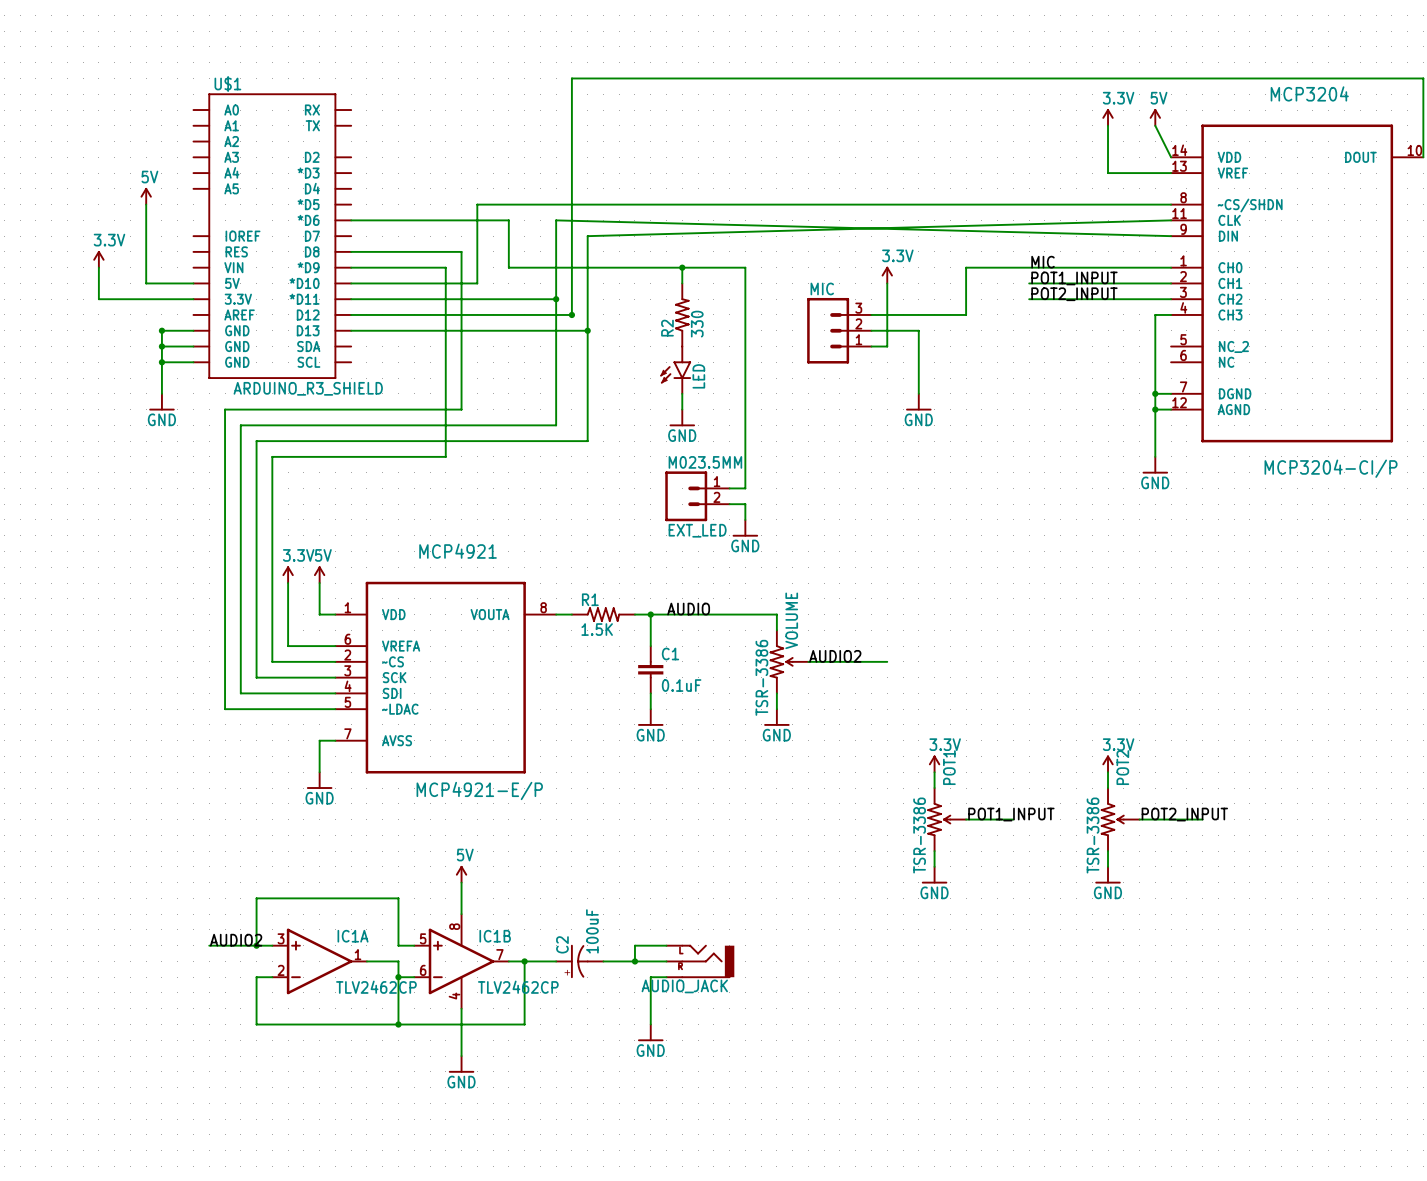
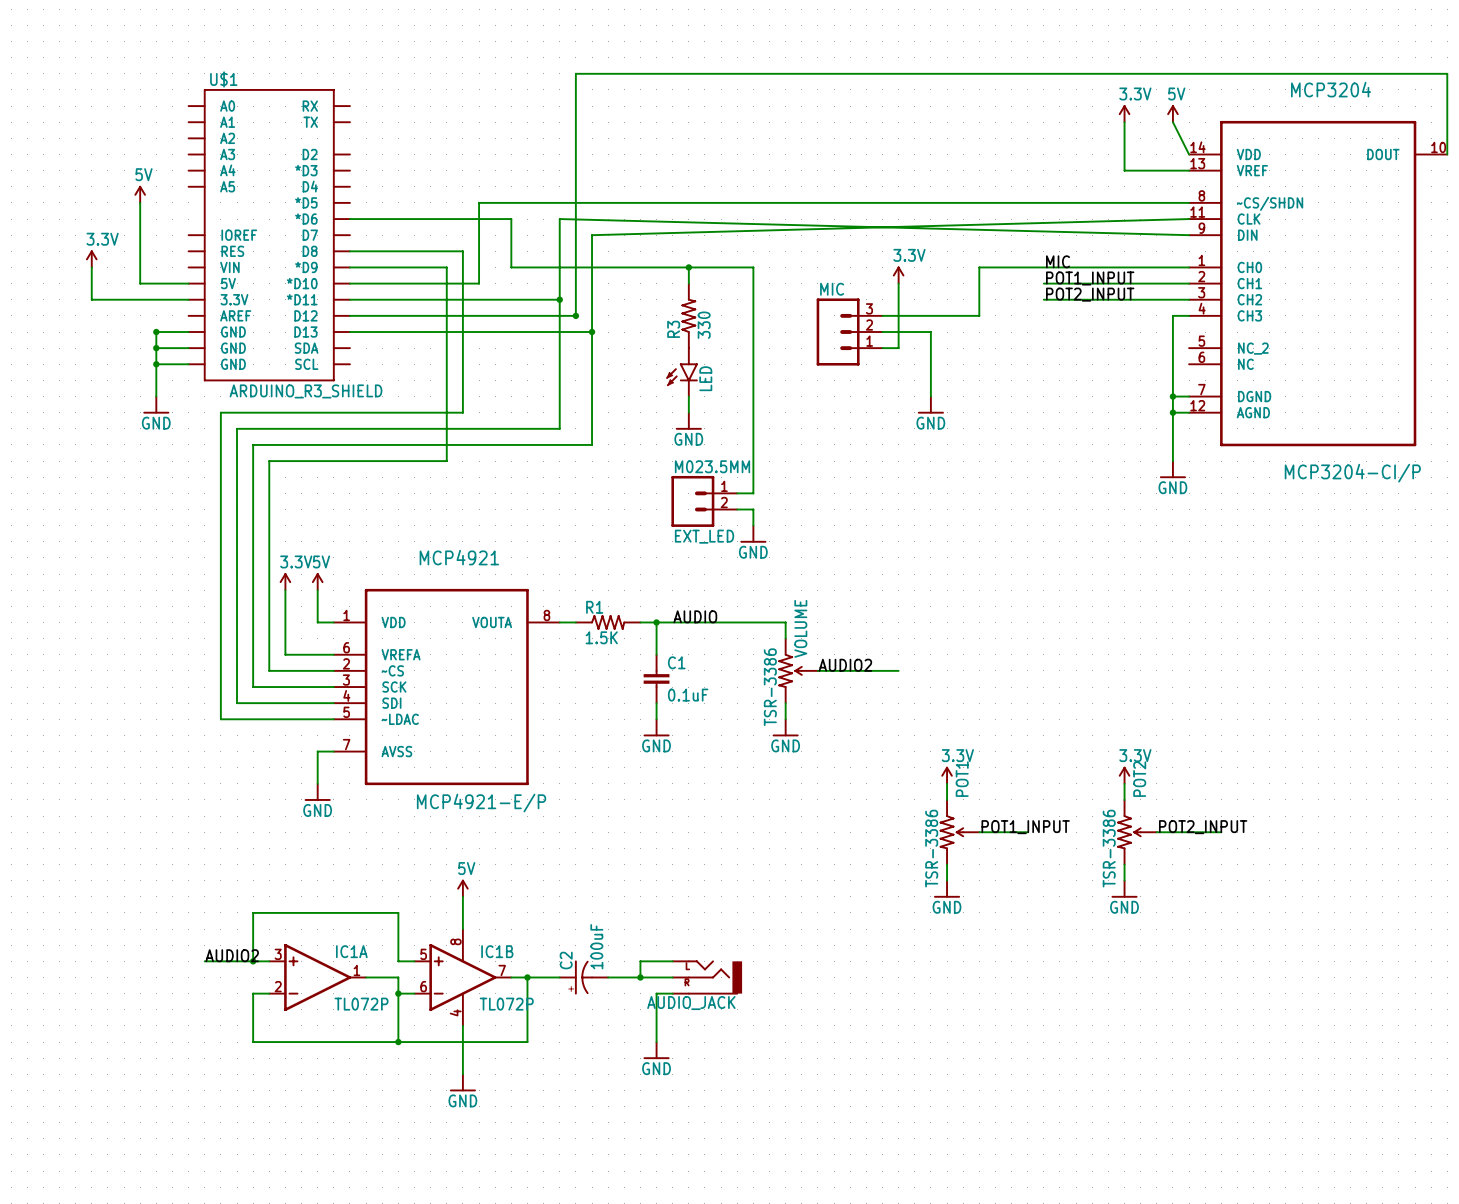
R2 name: R2 (667, 328) -> R3 (673, 329)
IC1A value: TLV2462CP (376, 987) -> TL072P (361, 1004)
IC1B value: TLV2462CP (518, 987) -> TL072P (506, 1004)

